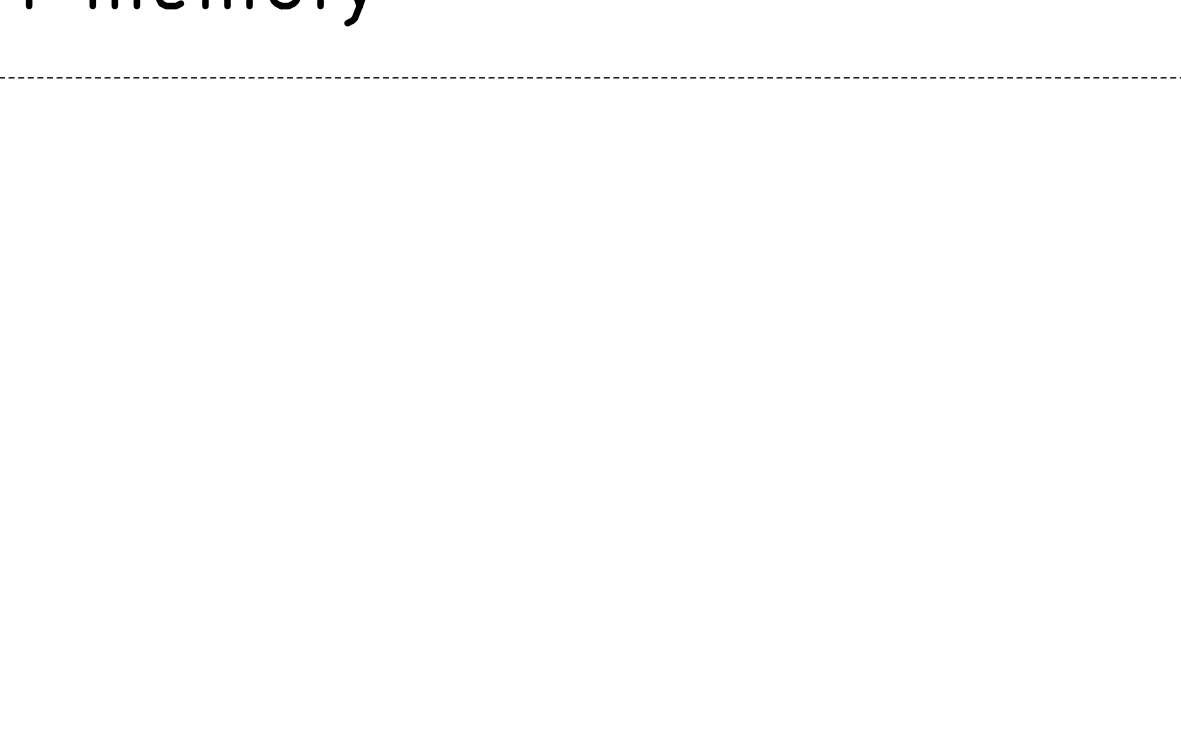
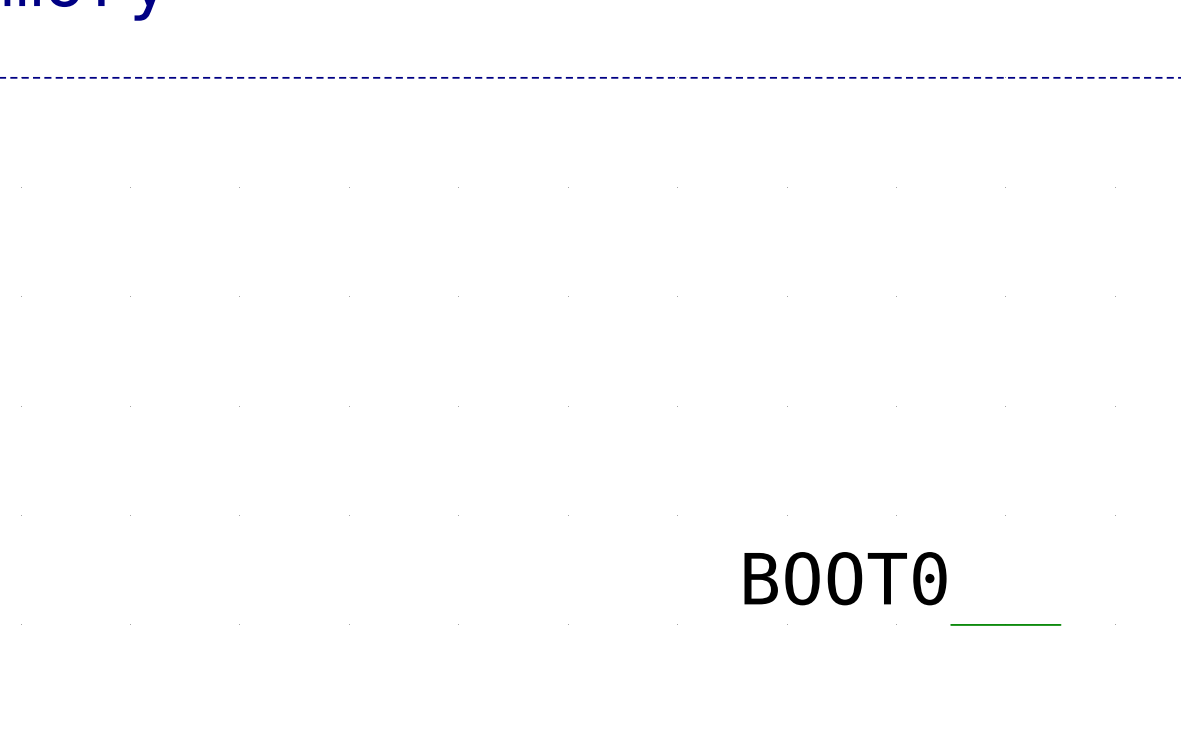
label: none -> BOOT0 (845, 578)
wire: none -> (951, 624) (1060, 624)

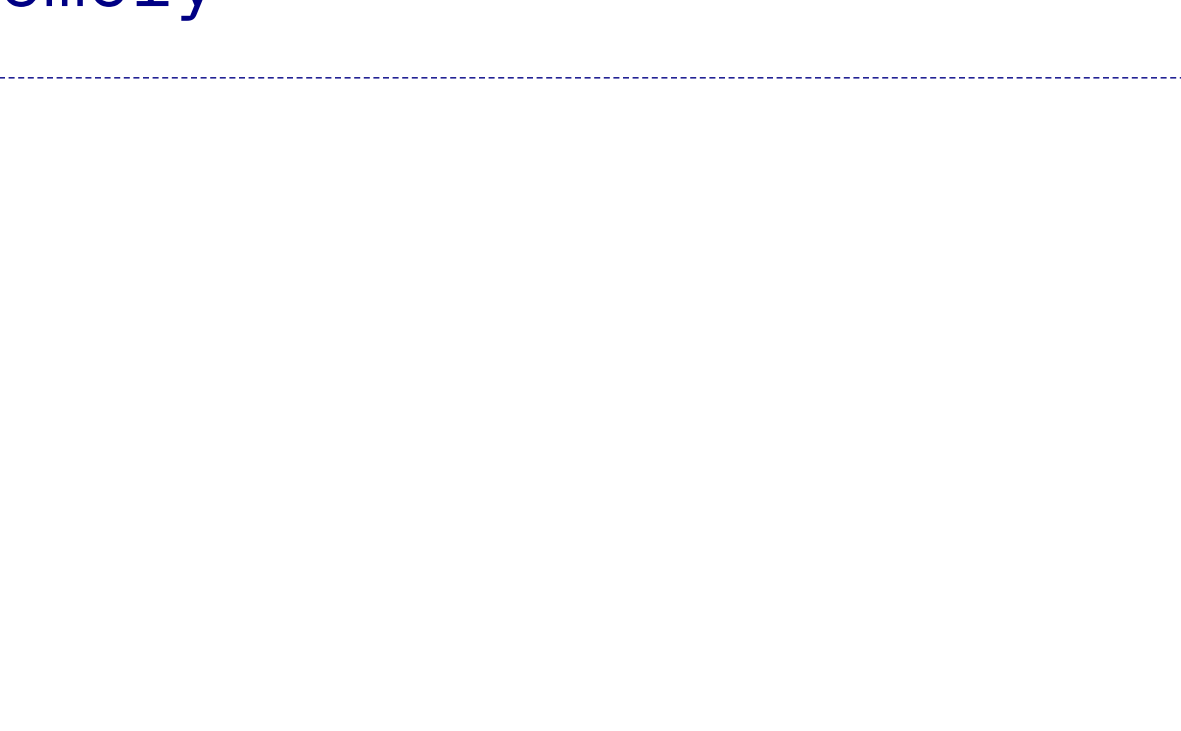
label: BOOT0 (845, 578) -> none
wire: (951, 624) (1060, 624) -> none

